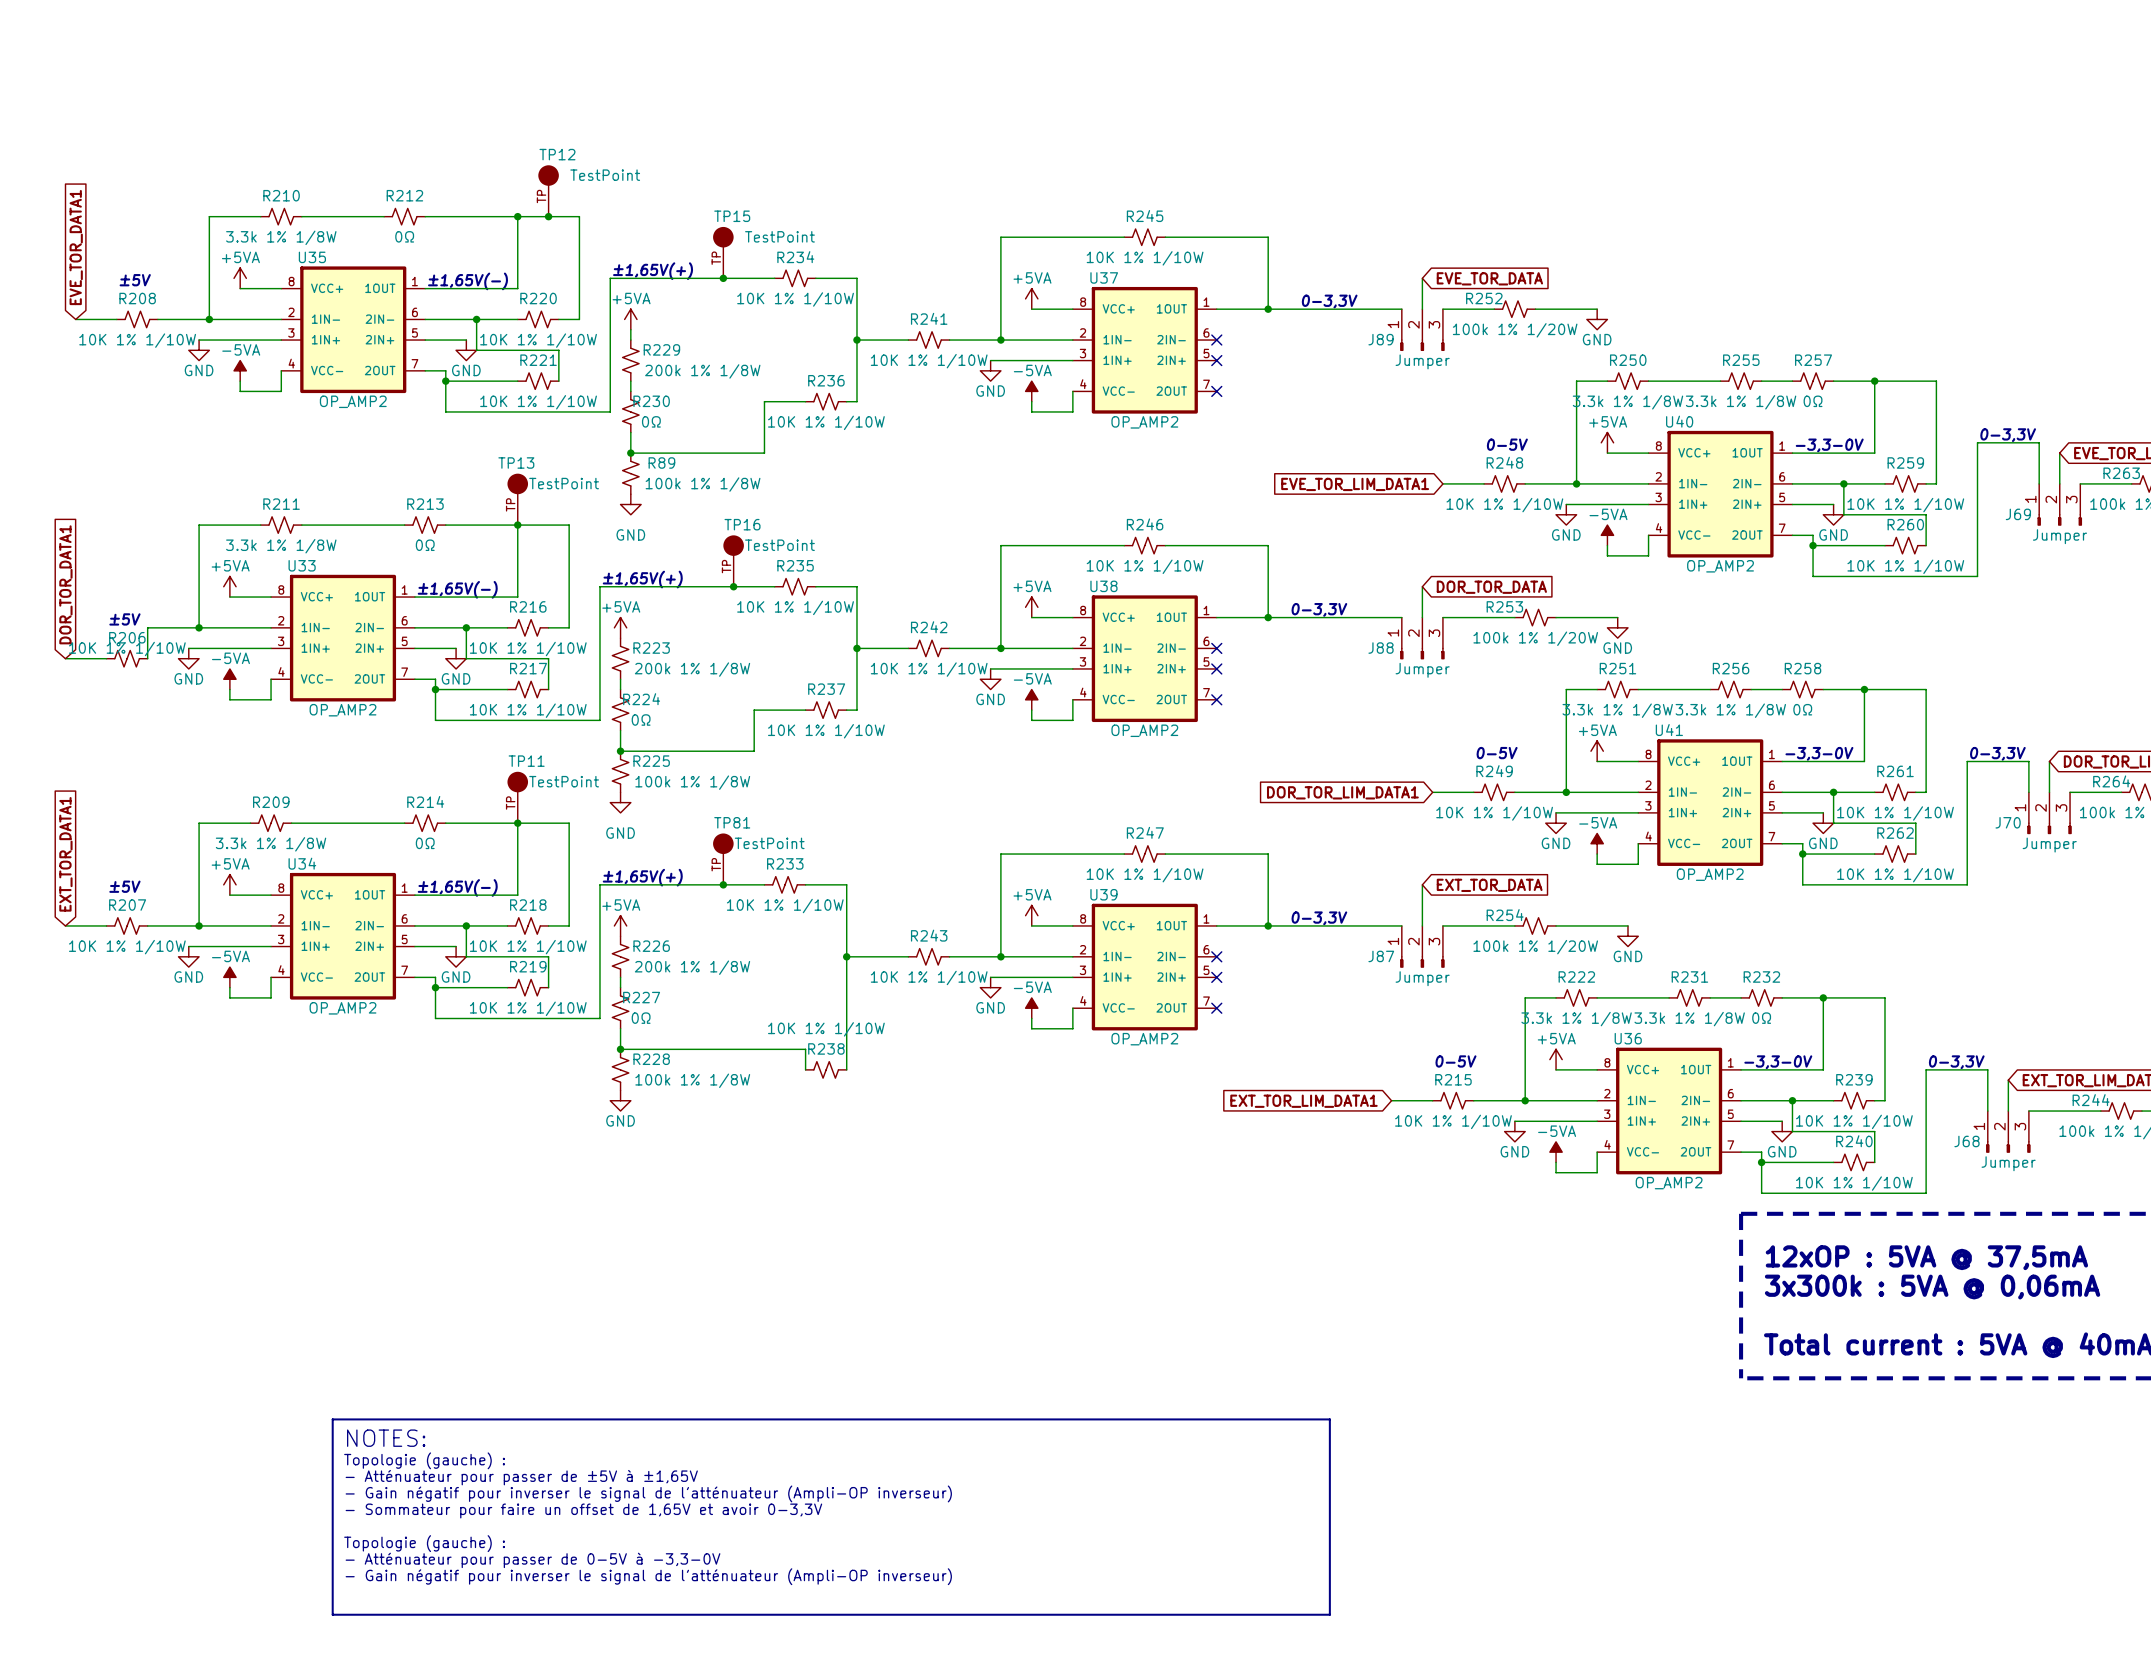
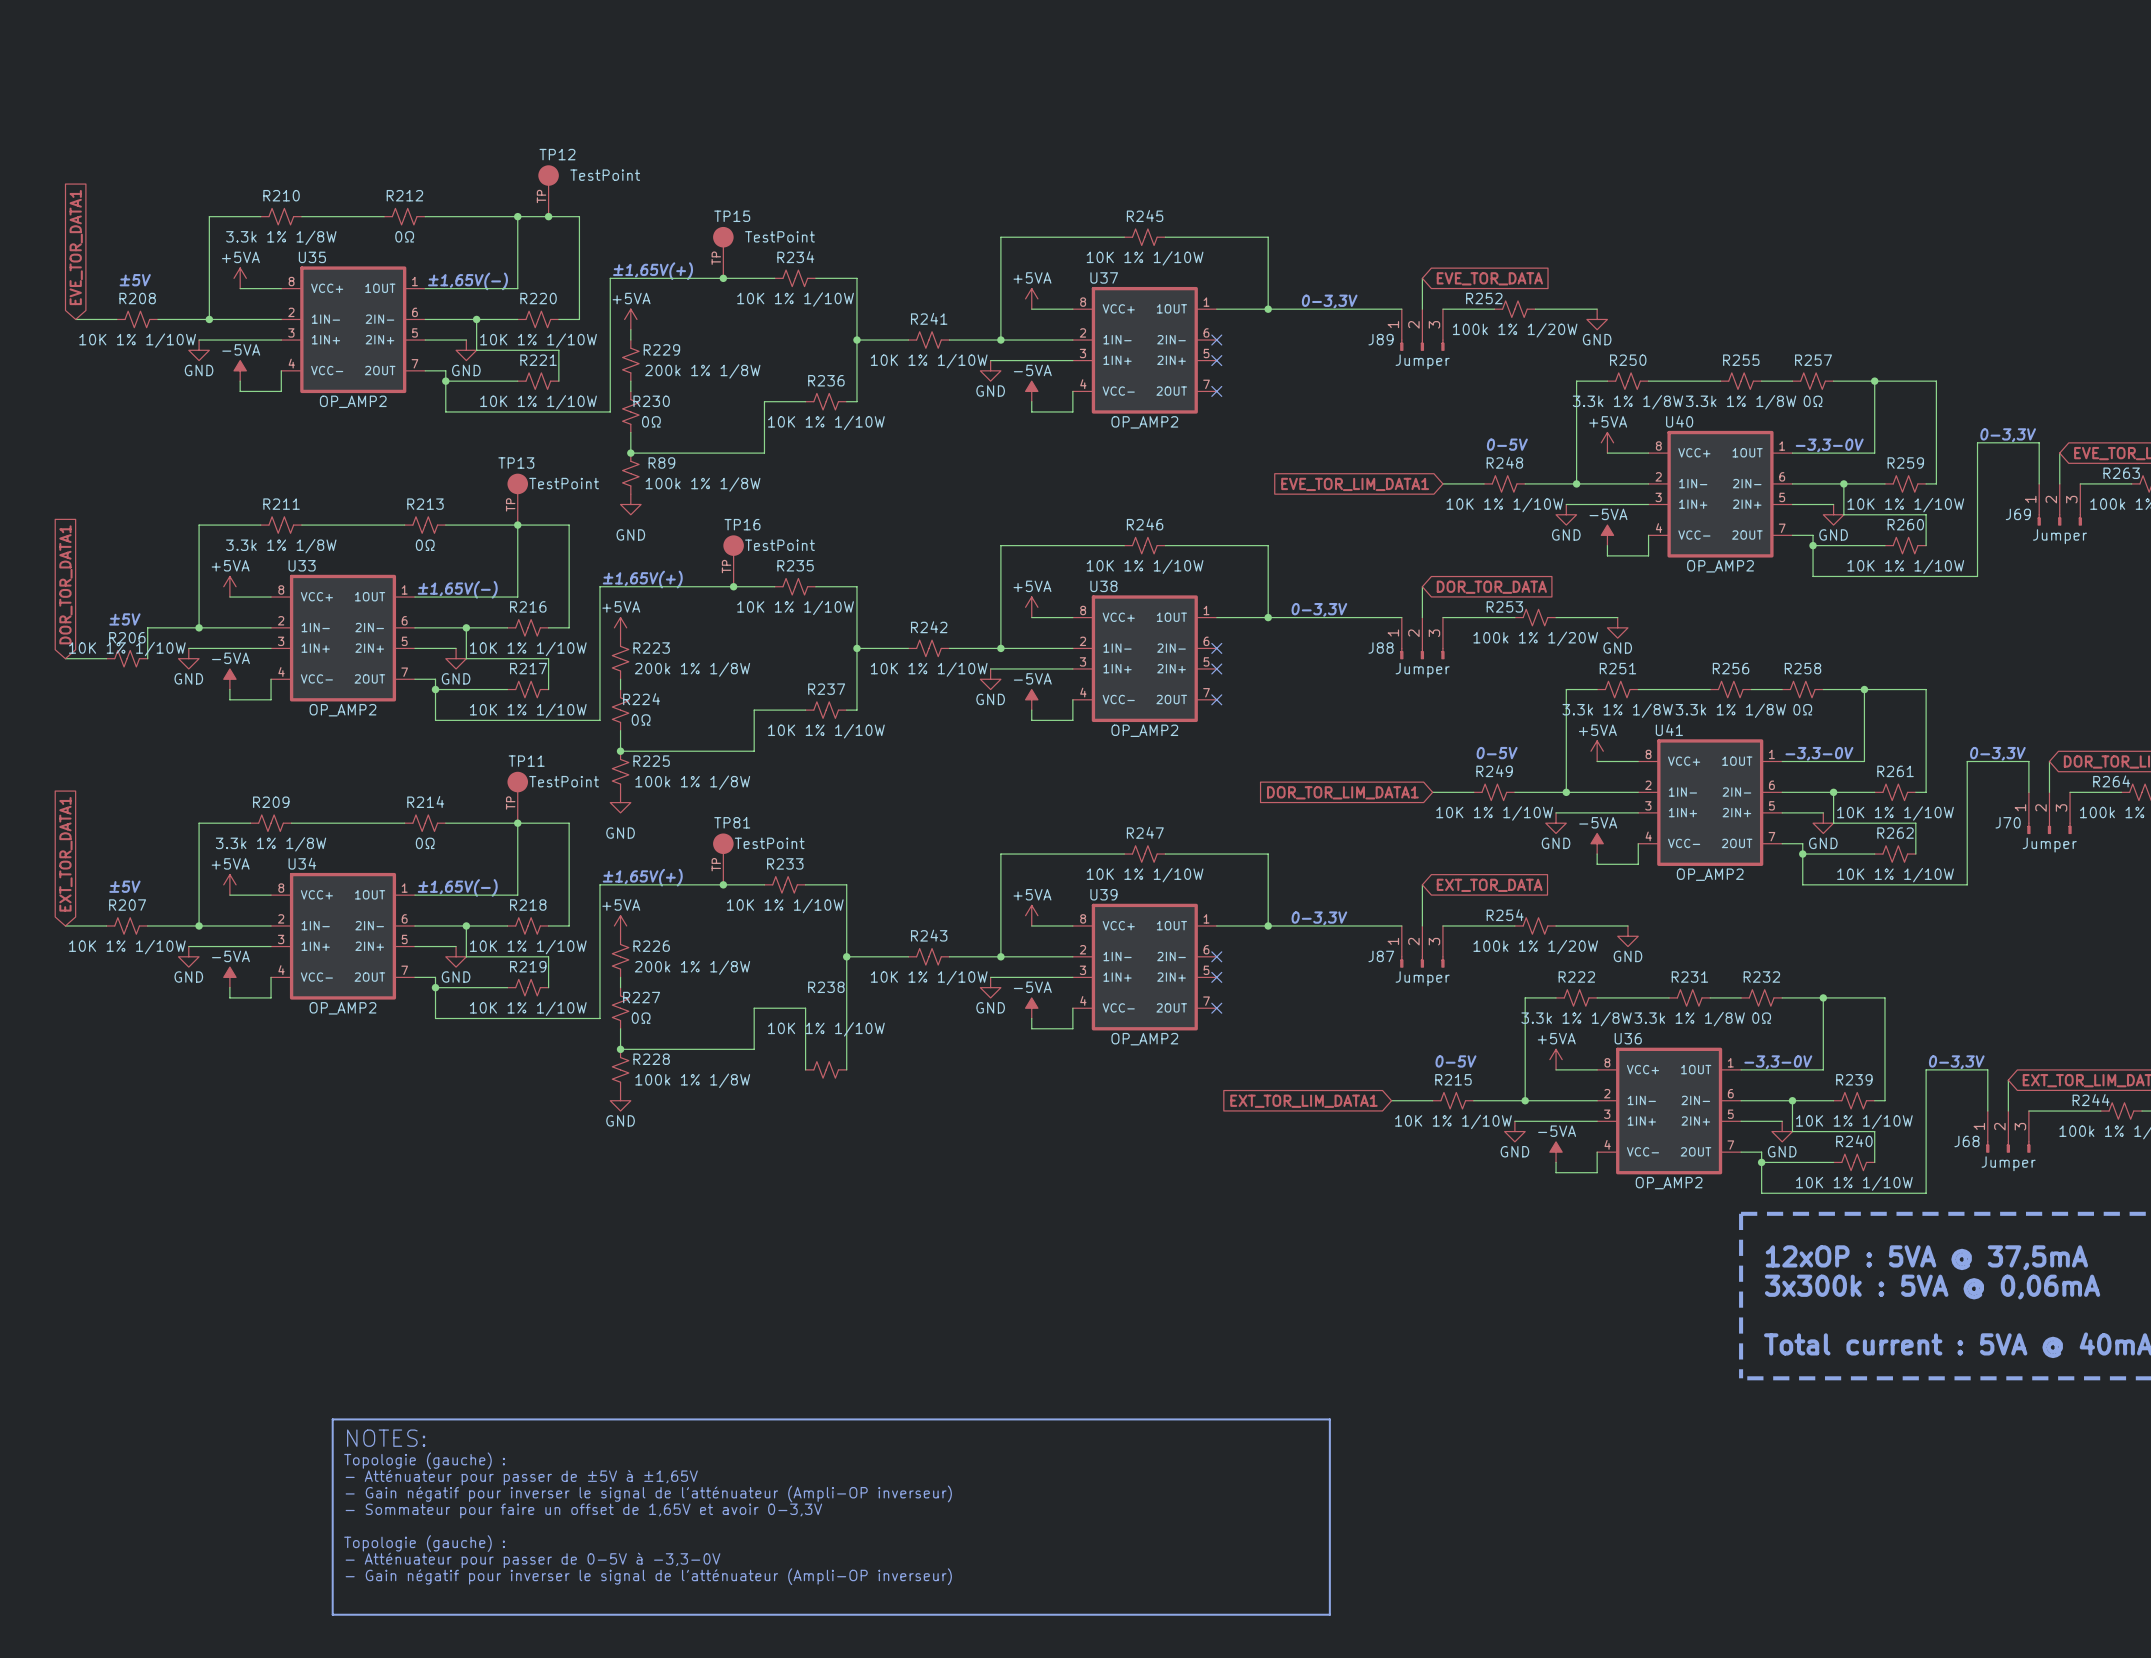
R238 name position: R238 (826, 1048) -> R238 (826, 987)
wire: (754, 1049) (805, 1049) -> (754, 1049) (754, 1008) (805, 1008) (805, 1049)

